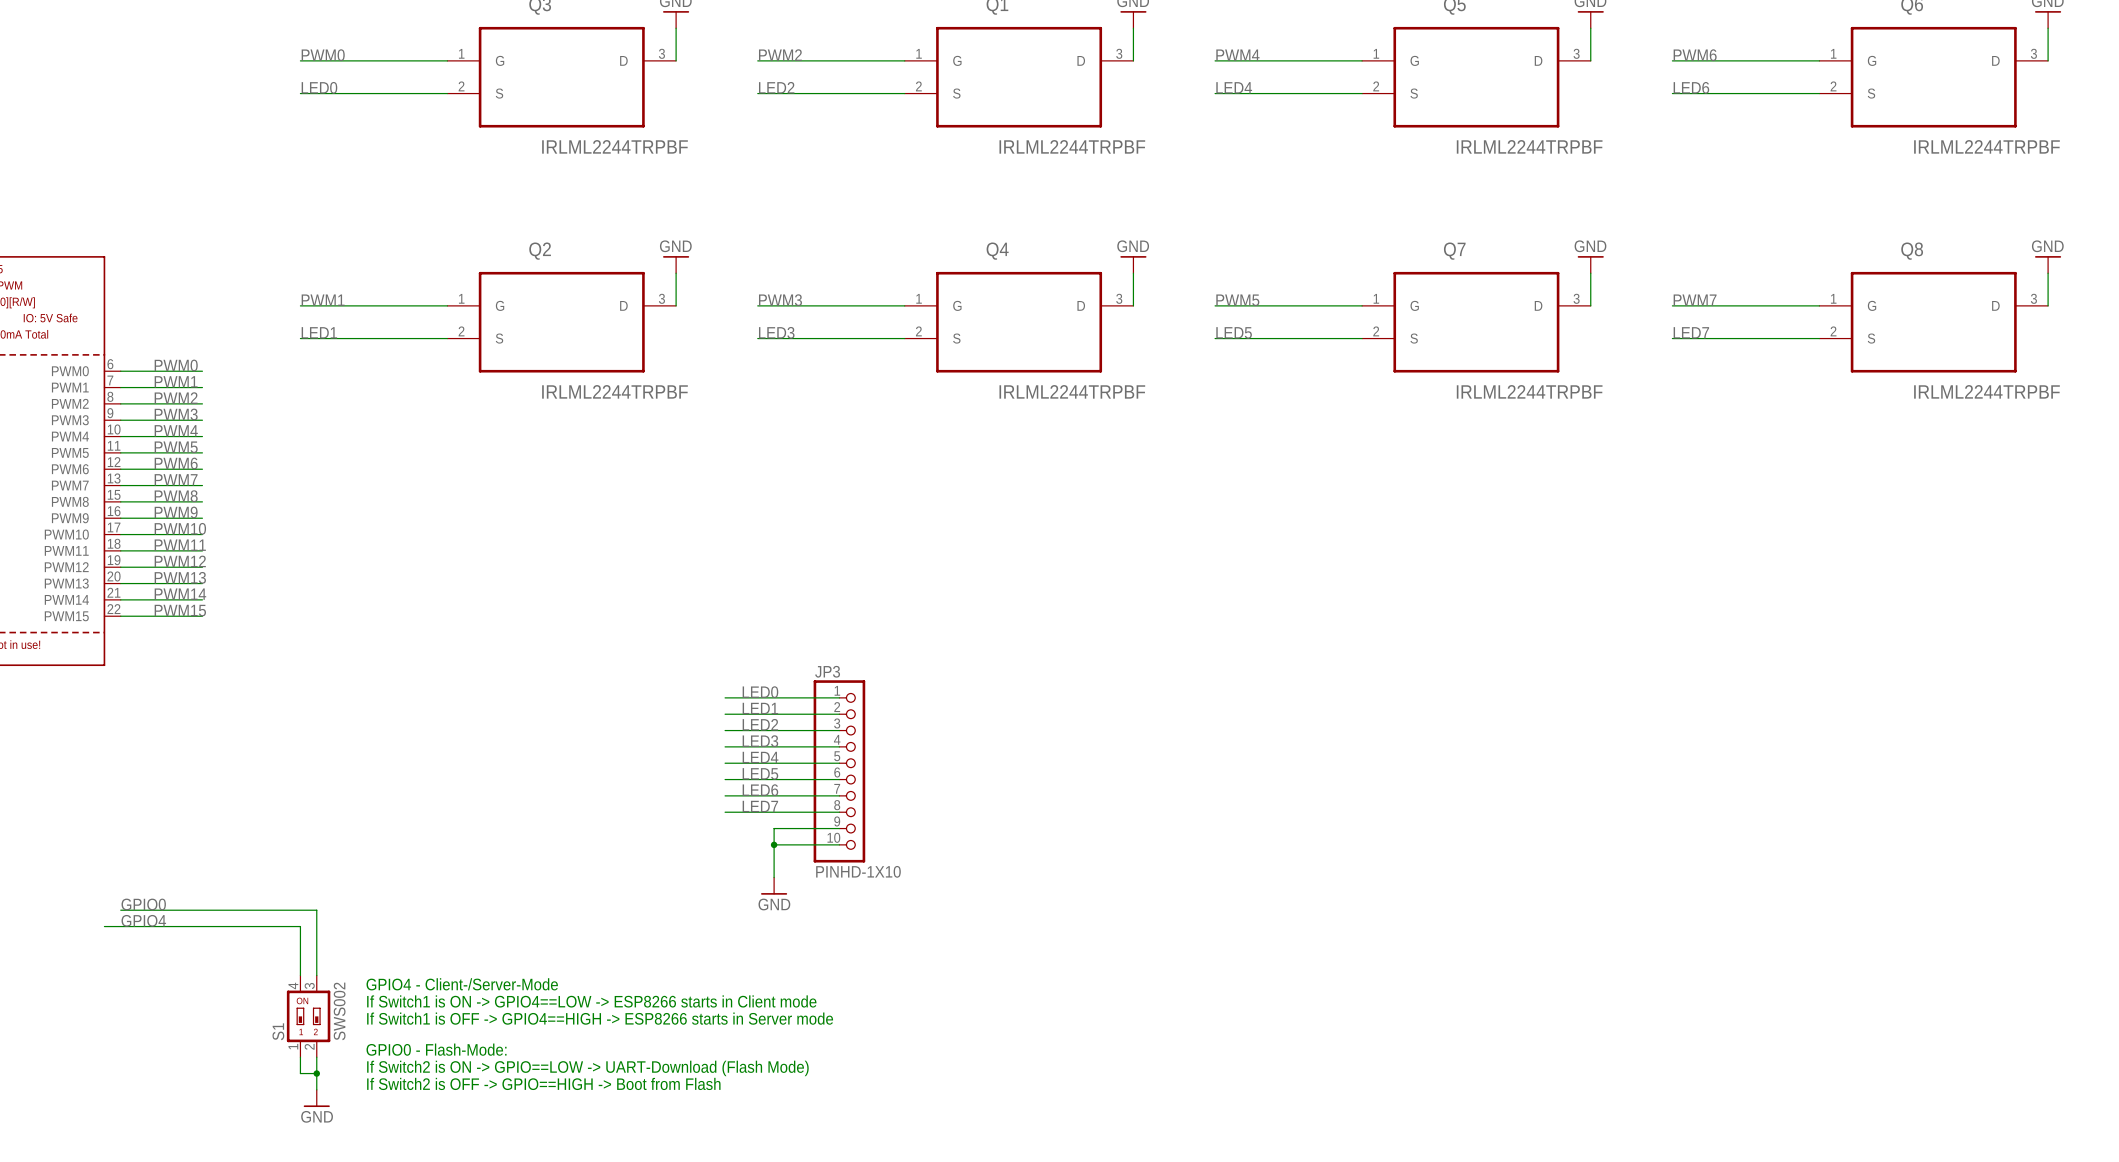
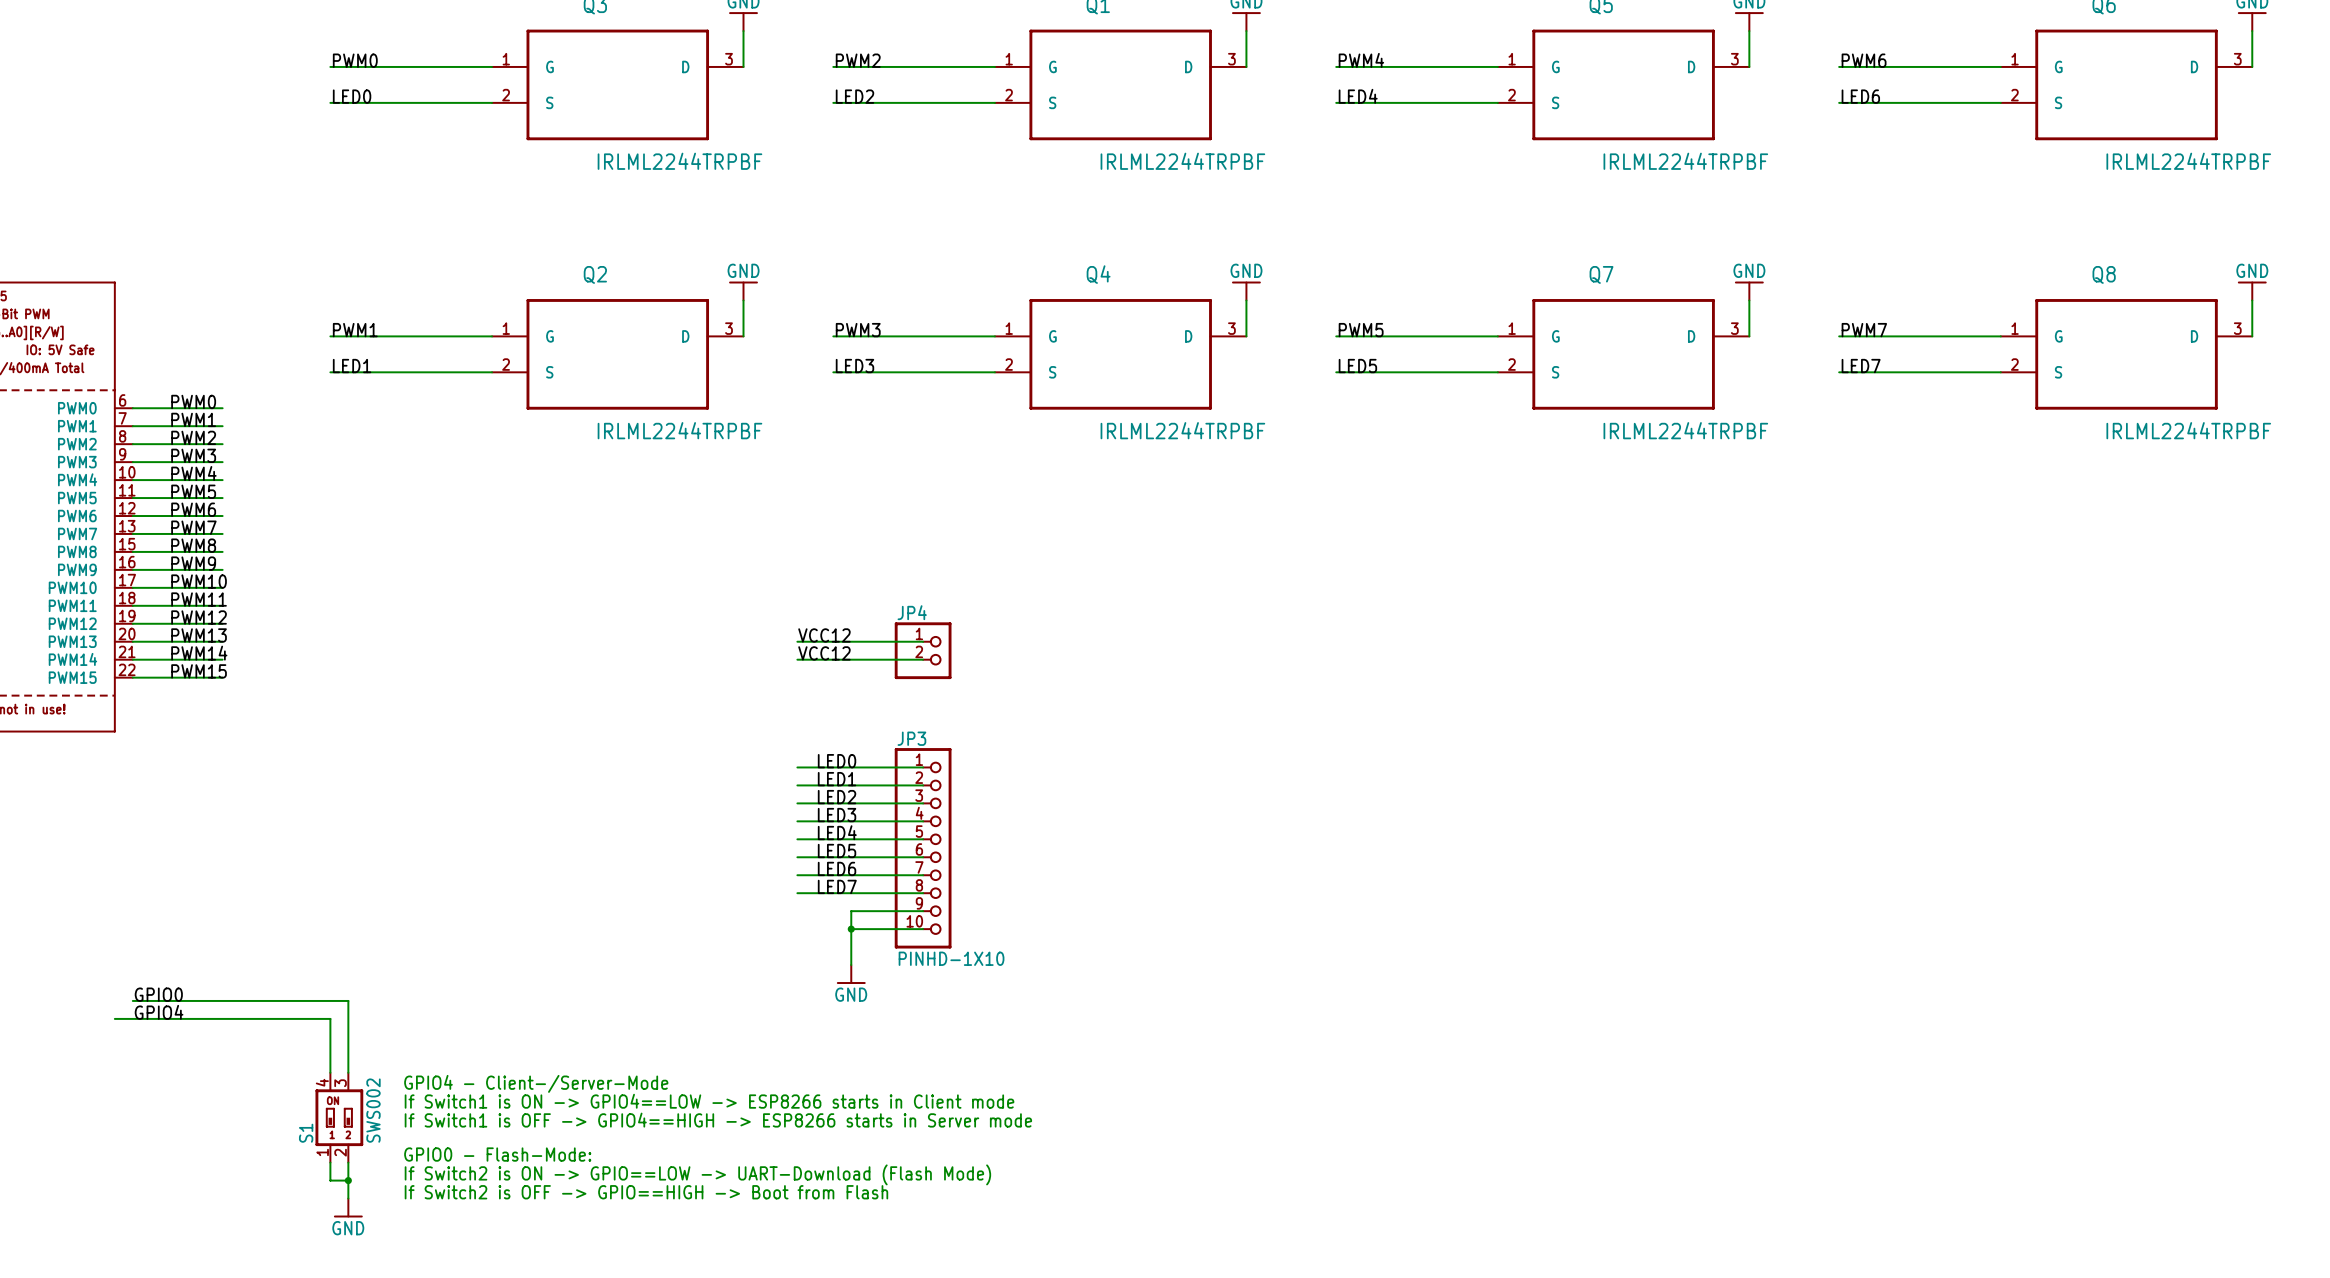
label: none -> VCC12 (824, 635)
wire: none -> (797, 641) (923, 641)
JP4: none -> (923, 650)
label: none -> VCC12 (824, 653)
wire: none -> (797, 659) (923, 659)

